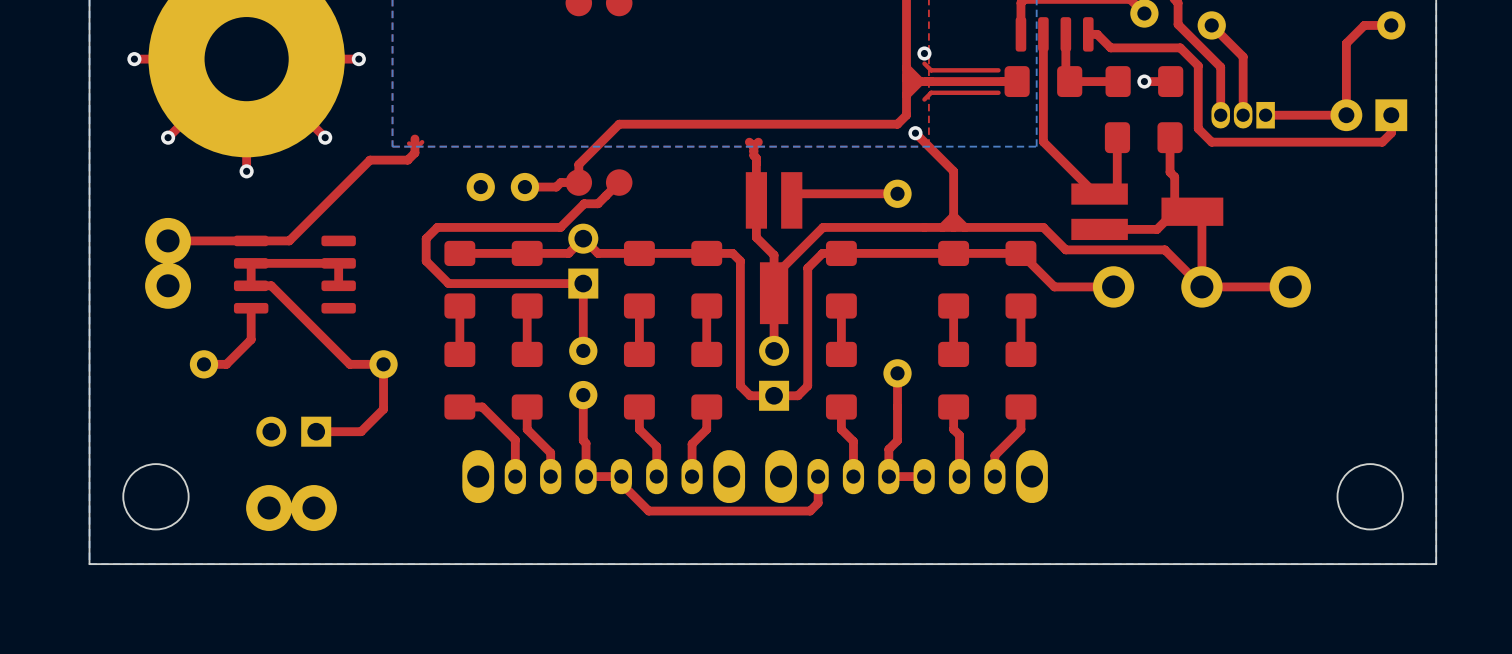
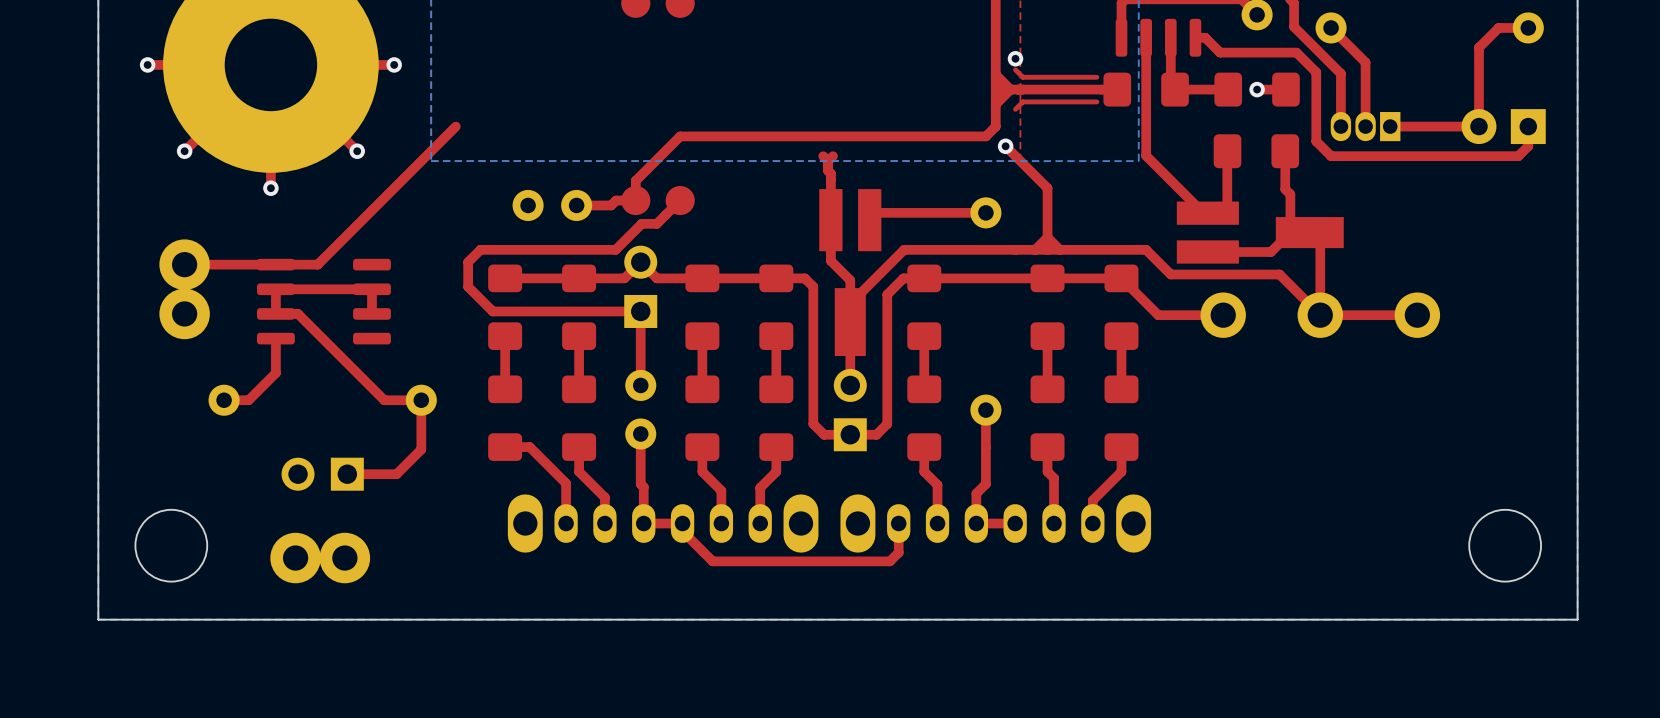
top track: (414, 139) (414, 152) -> none
top track: (422, 142) (414, 149) -> none
top track: (409, 143) (414, 149) -> none
top track: (414, 152) (407, 160) (370, 160) -> (455, 126) (406, 175)

